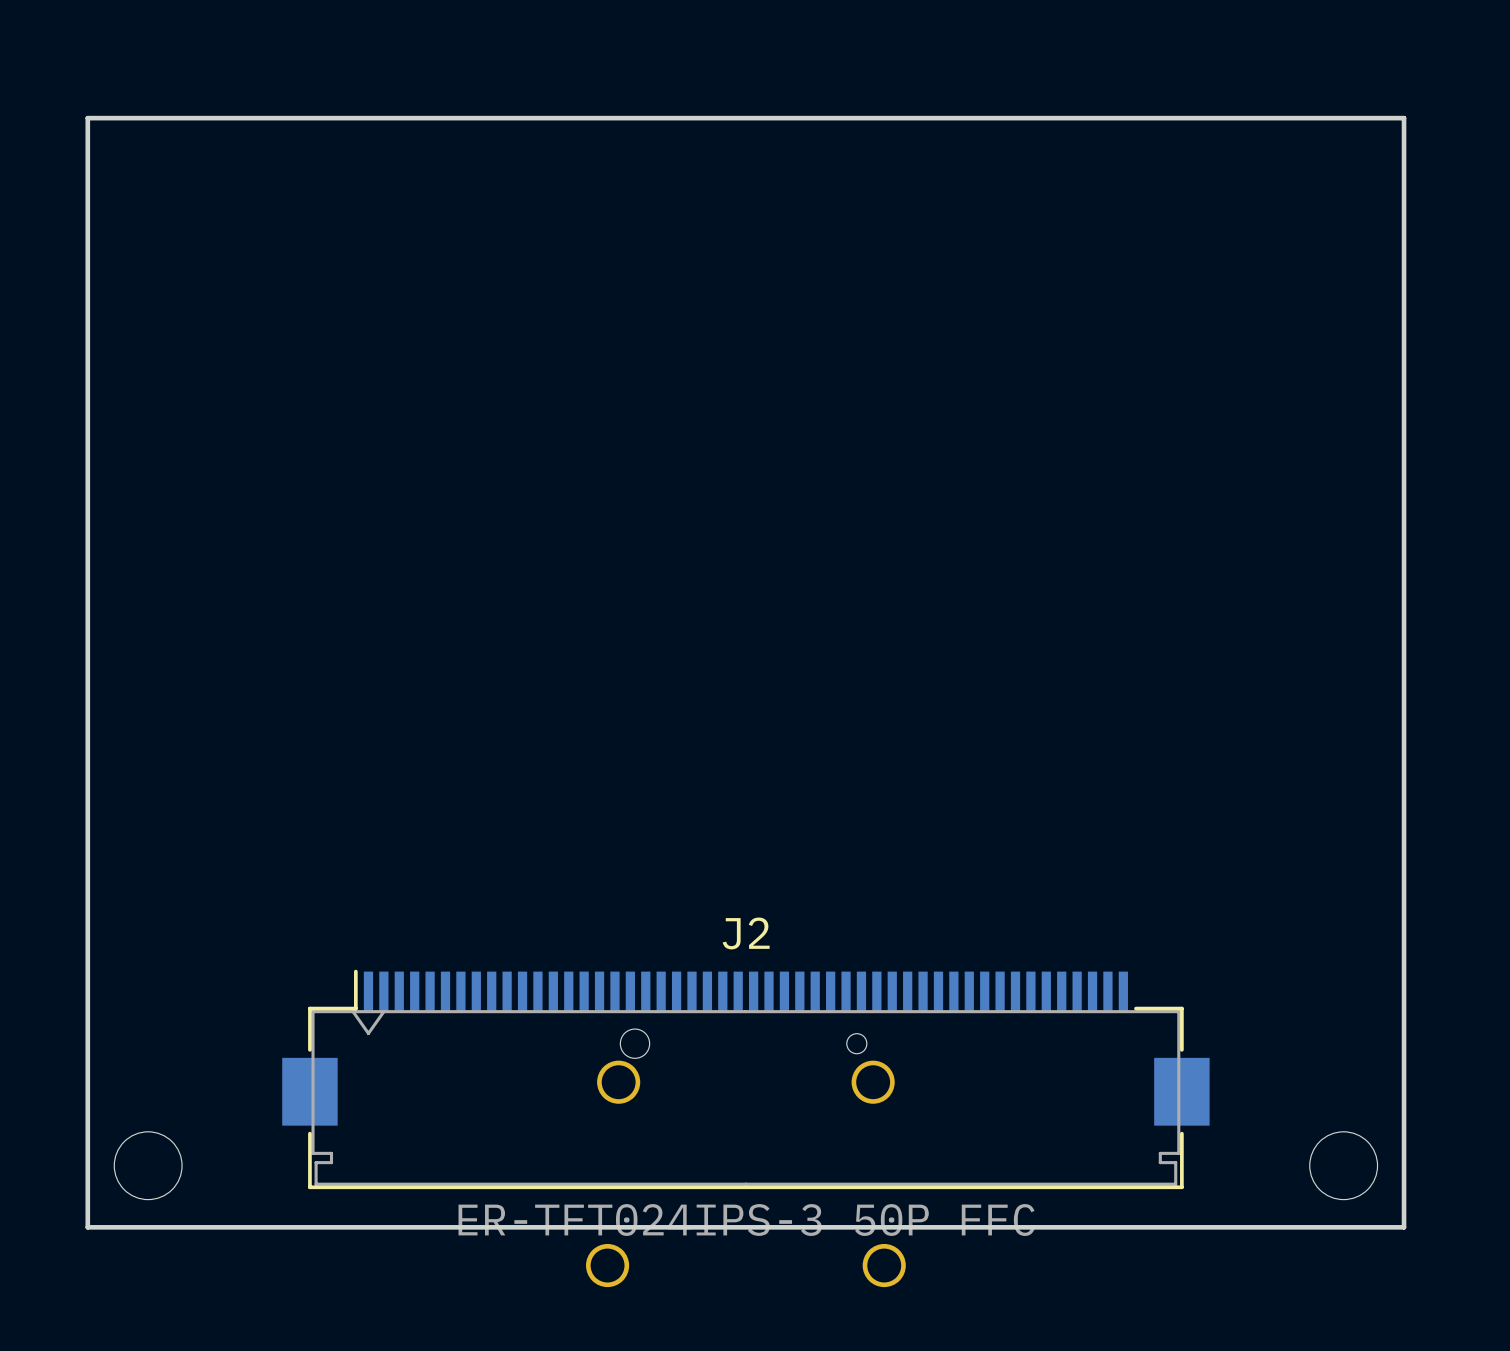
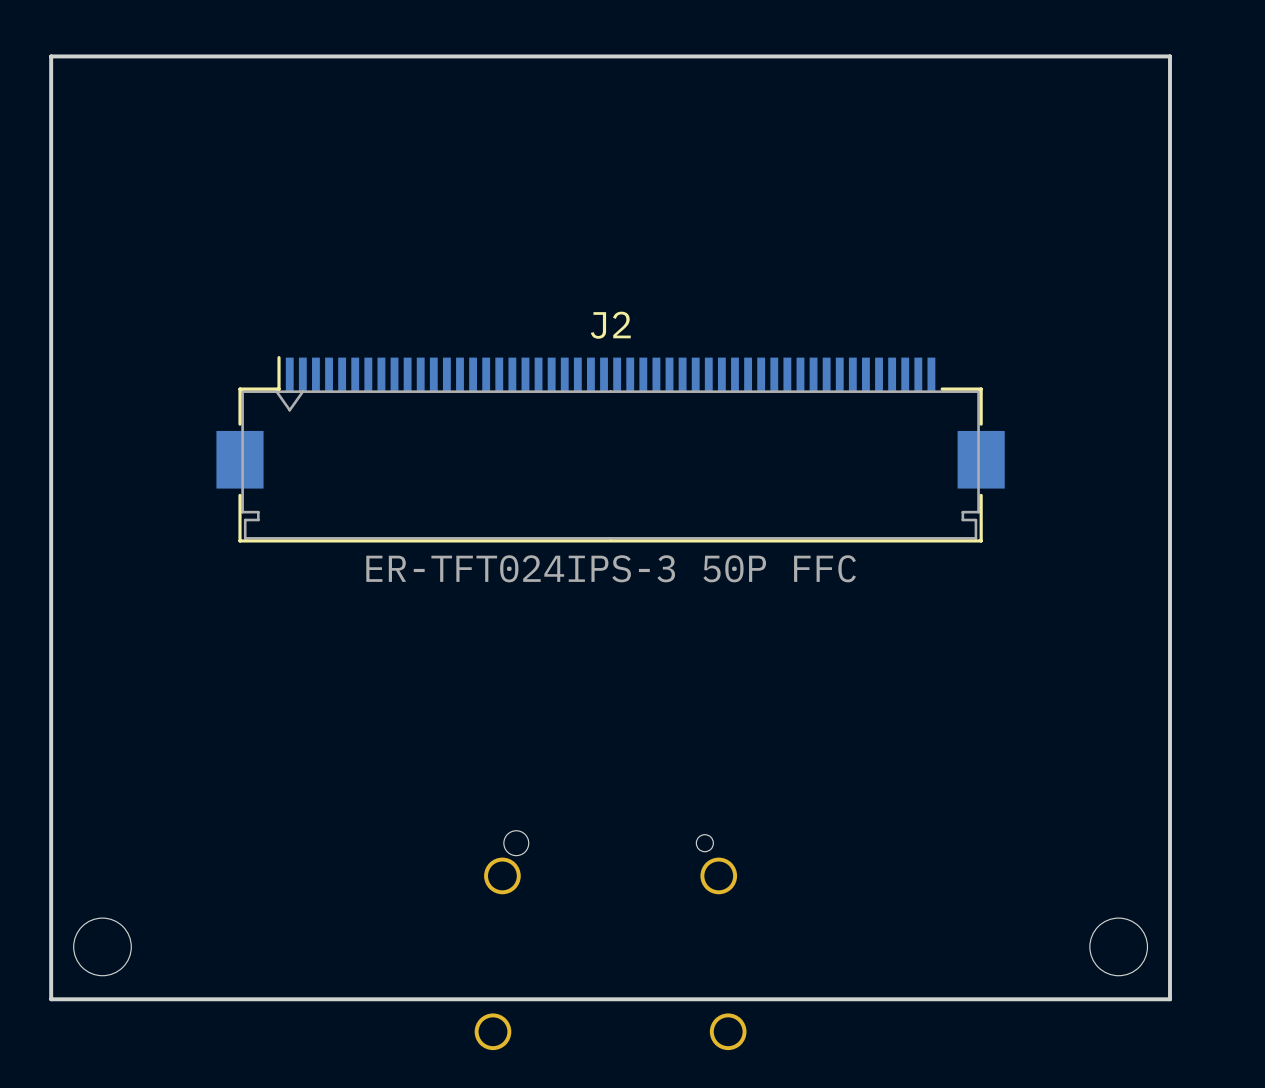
J2 position: (745, 1079) -> (610, 449)

